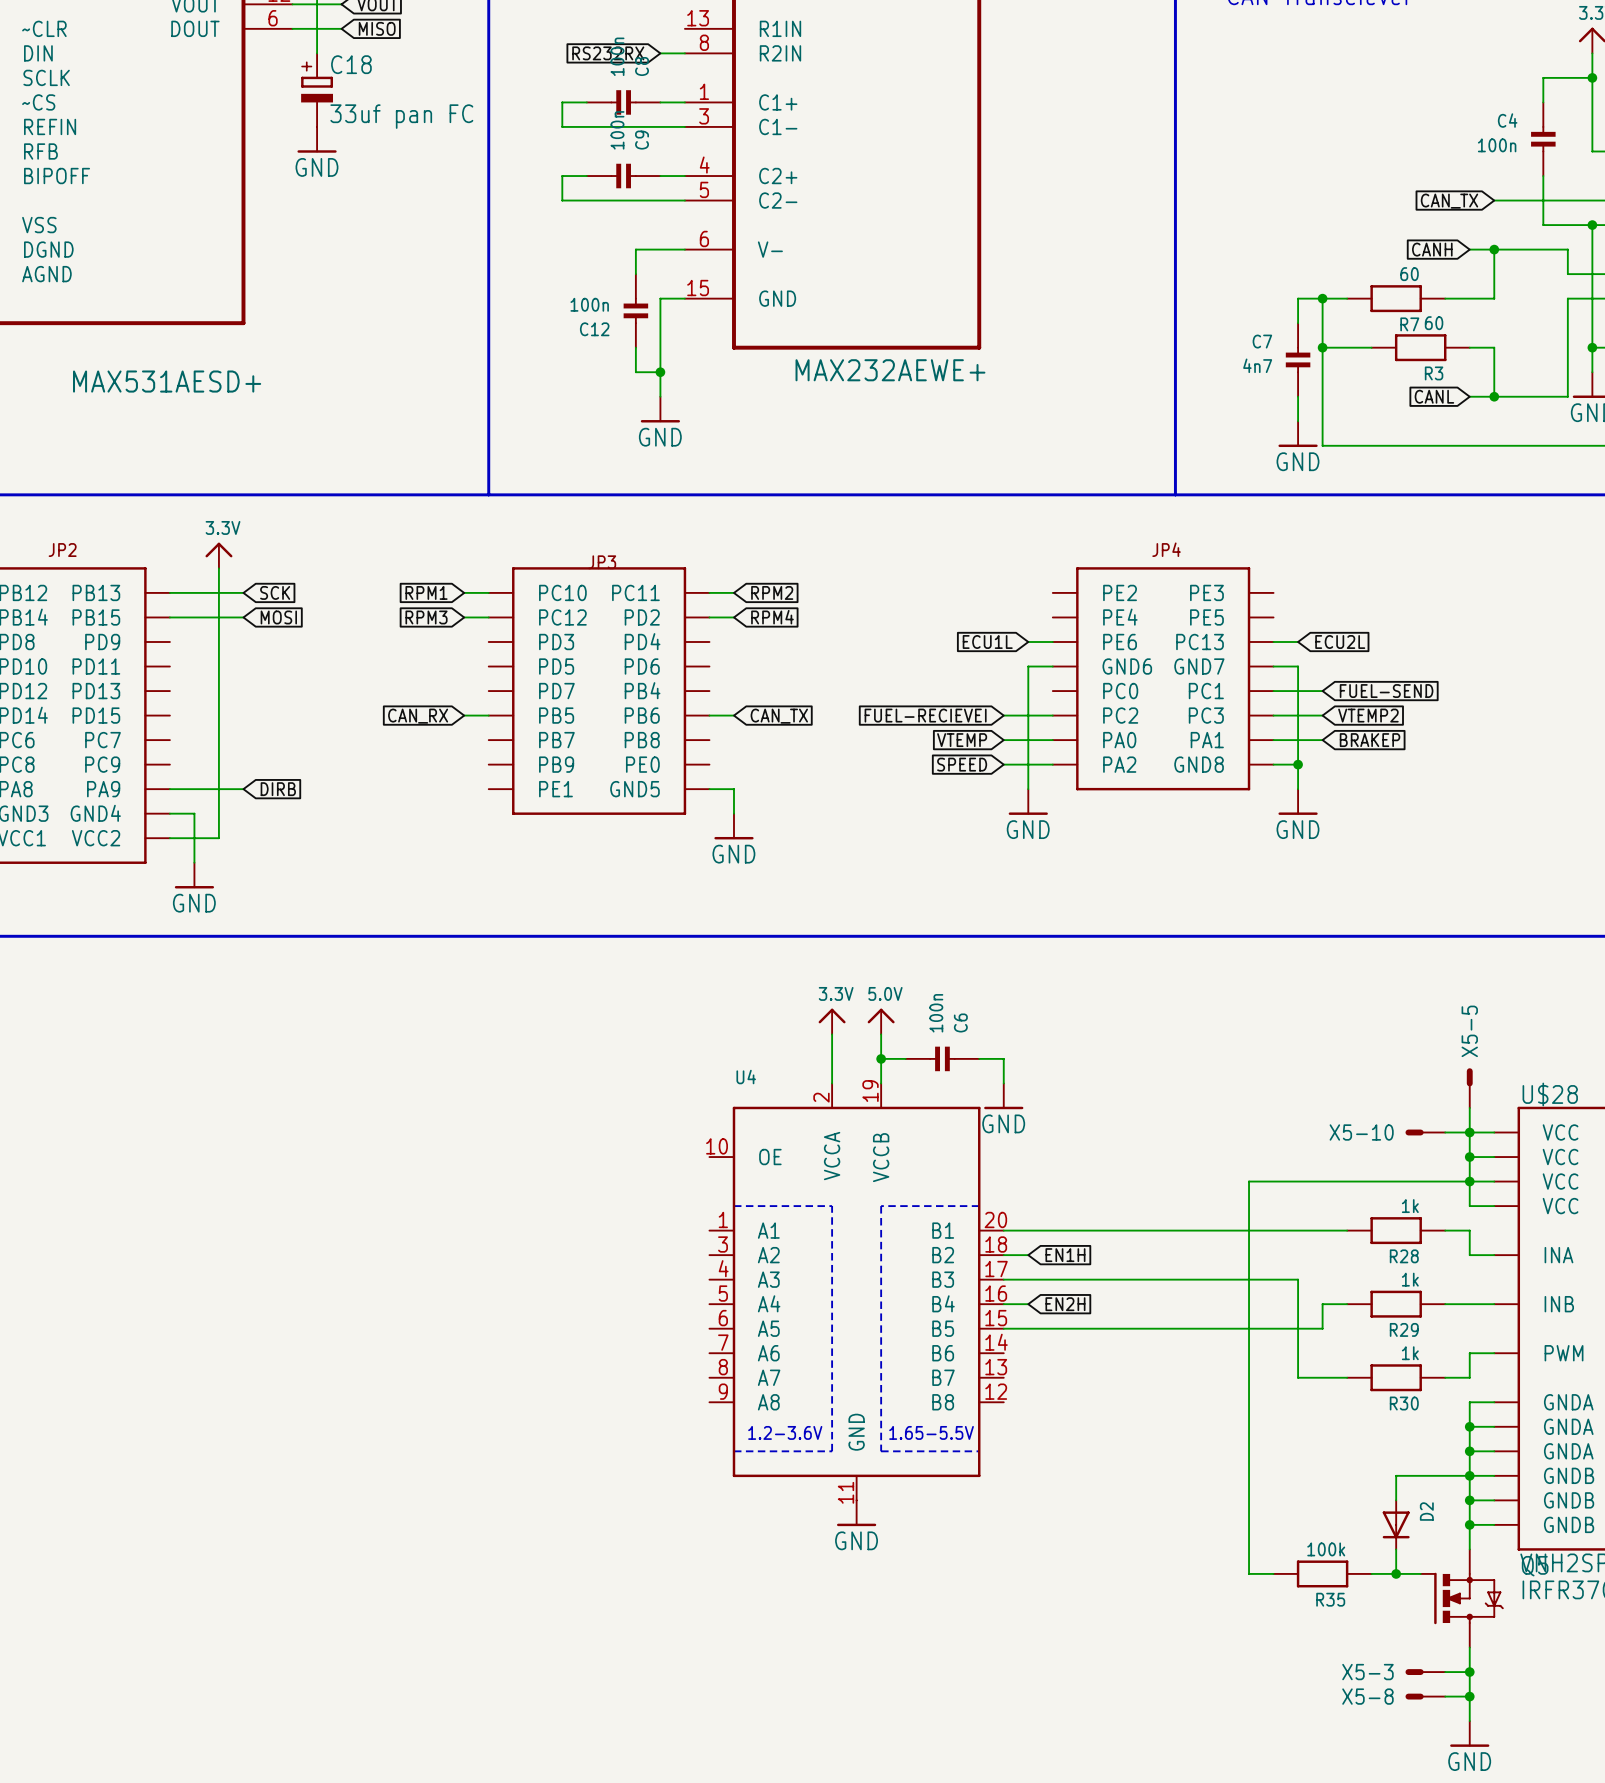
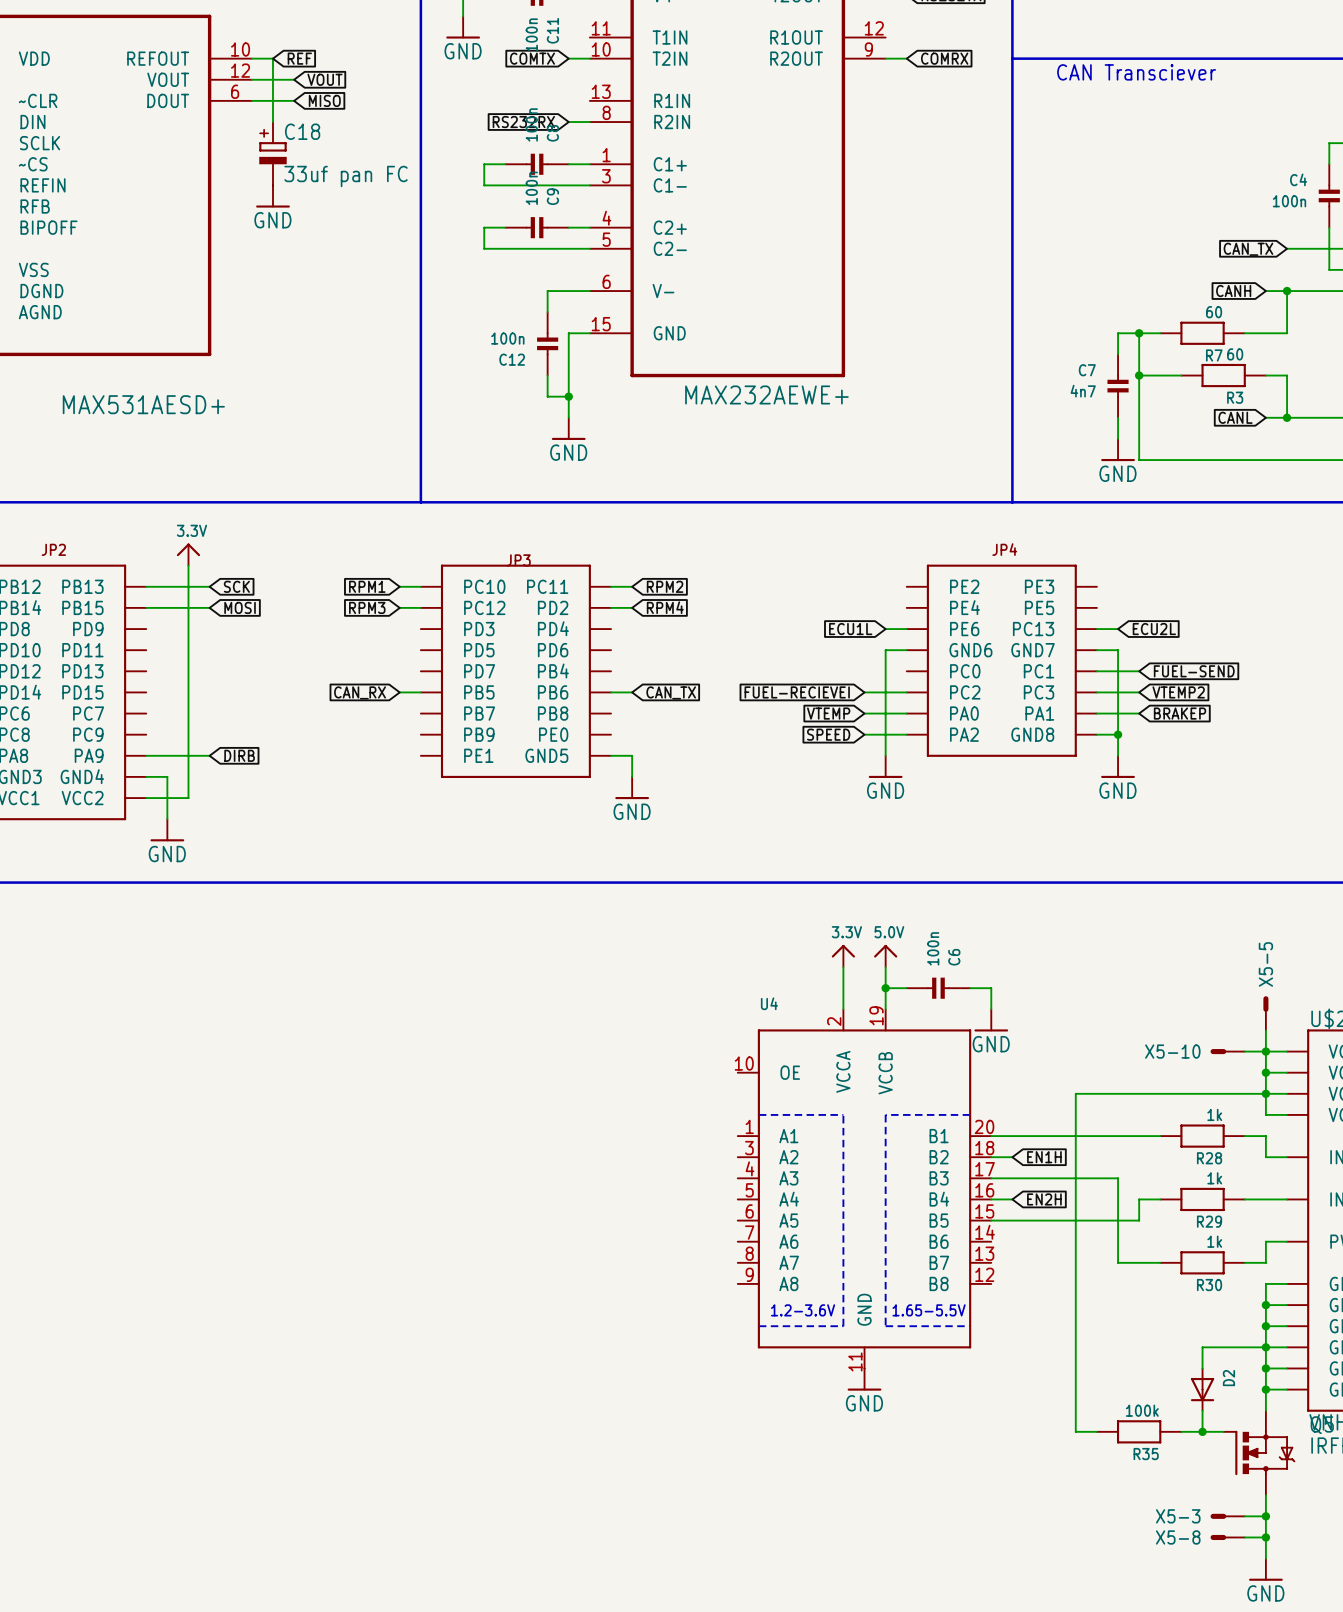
power symbol position: 3.3V (832, 1021) -> 3.3V (843, 955)
power symbol position: 5.0V (881, 1021) -> 5.0V (885, 955)
wire: (832, 1034) (832, 1083) -> (843, 967) (843, 1009)
wire: (881, 1034) (881, 1083) -> (885, 967) (885, 1009)
wire: (881, 1058) (905, 1058) -> (885, 988) (906, 988)
junction: (881, 1058) -> none
C6 position: (942, 1058) -> (938, 988)
wire: (979, 1058) (1003, 1058) (1003, 1083) -> (970, 988) (991, 988) (991, 1009)
junction: none -> (885, 988)
power symbol position: GND (1003, 1096) -> GND (991, 1020)
wire: (1003, 1230) (1150, 1230) -> none
wire: (1003, 1255) (1028, 1255) -> (991, 1157) (1012, 1157)
global label position: EN1H (1065, 1255) -> EN1H (1044, 1157)
wire: (1003, 1279) (1150, 1279) -> none
U4 position: (856, 1291) -> (864, 1188)
wire: (1003, 1304) (1028, 1304) -> (991, 1199) (1012, 1199)
global label position: EN2H (1065, 1304) -> EN2H (1044, 1199)
wire: (1003, 1328) (1150, 1328) -> none
power symbol position: GND (856, 1513) -> GND (864, 1379)

